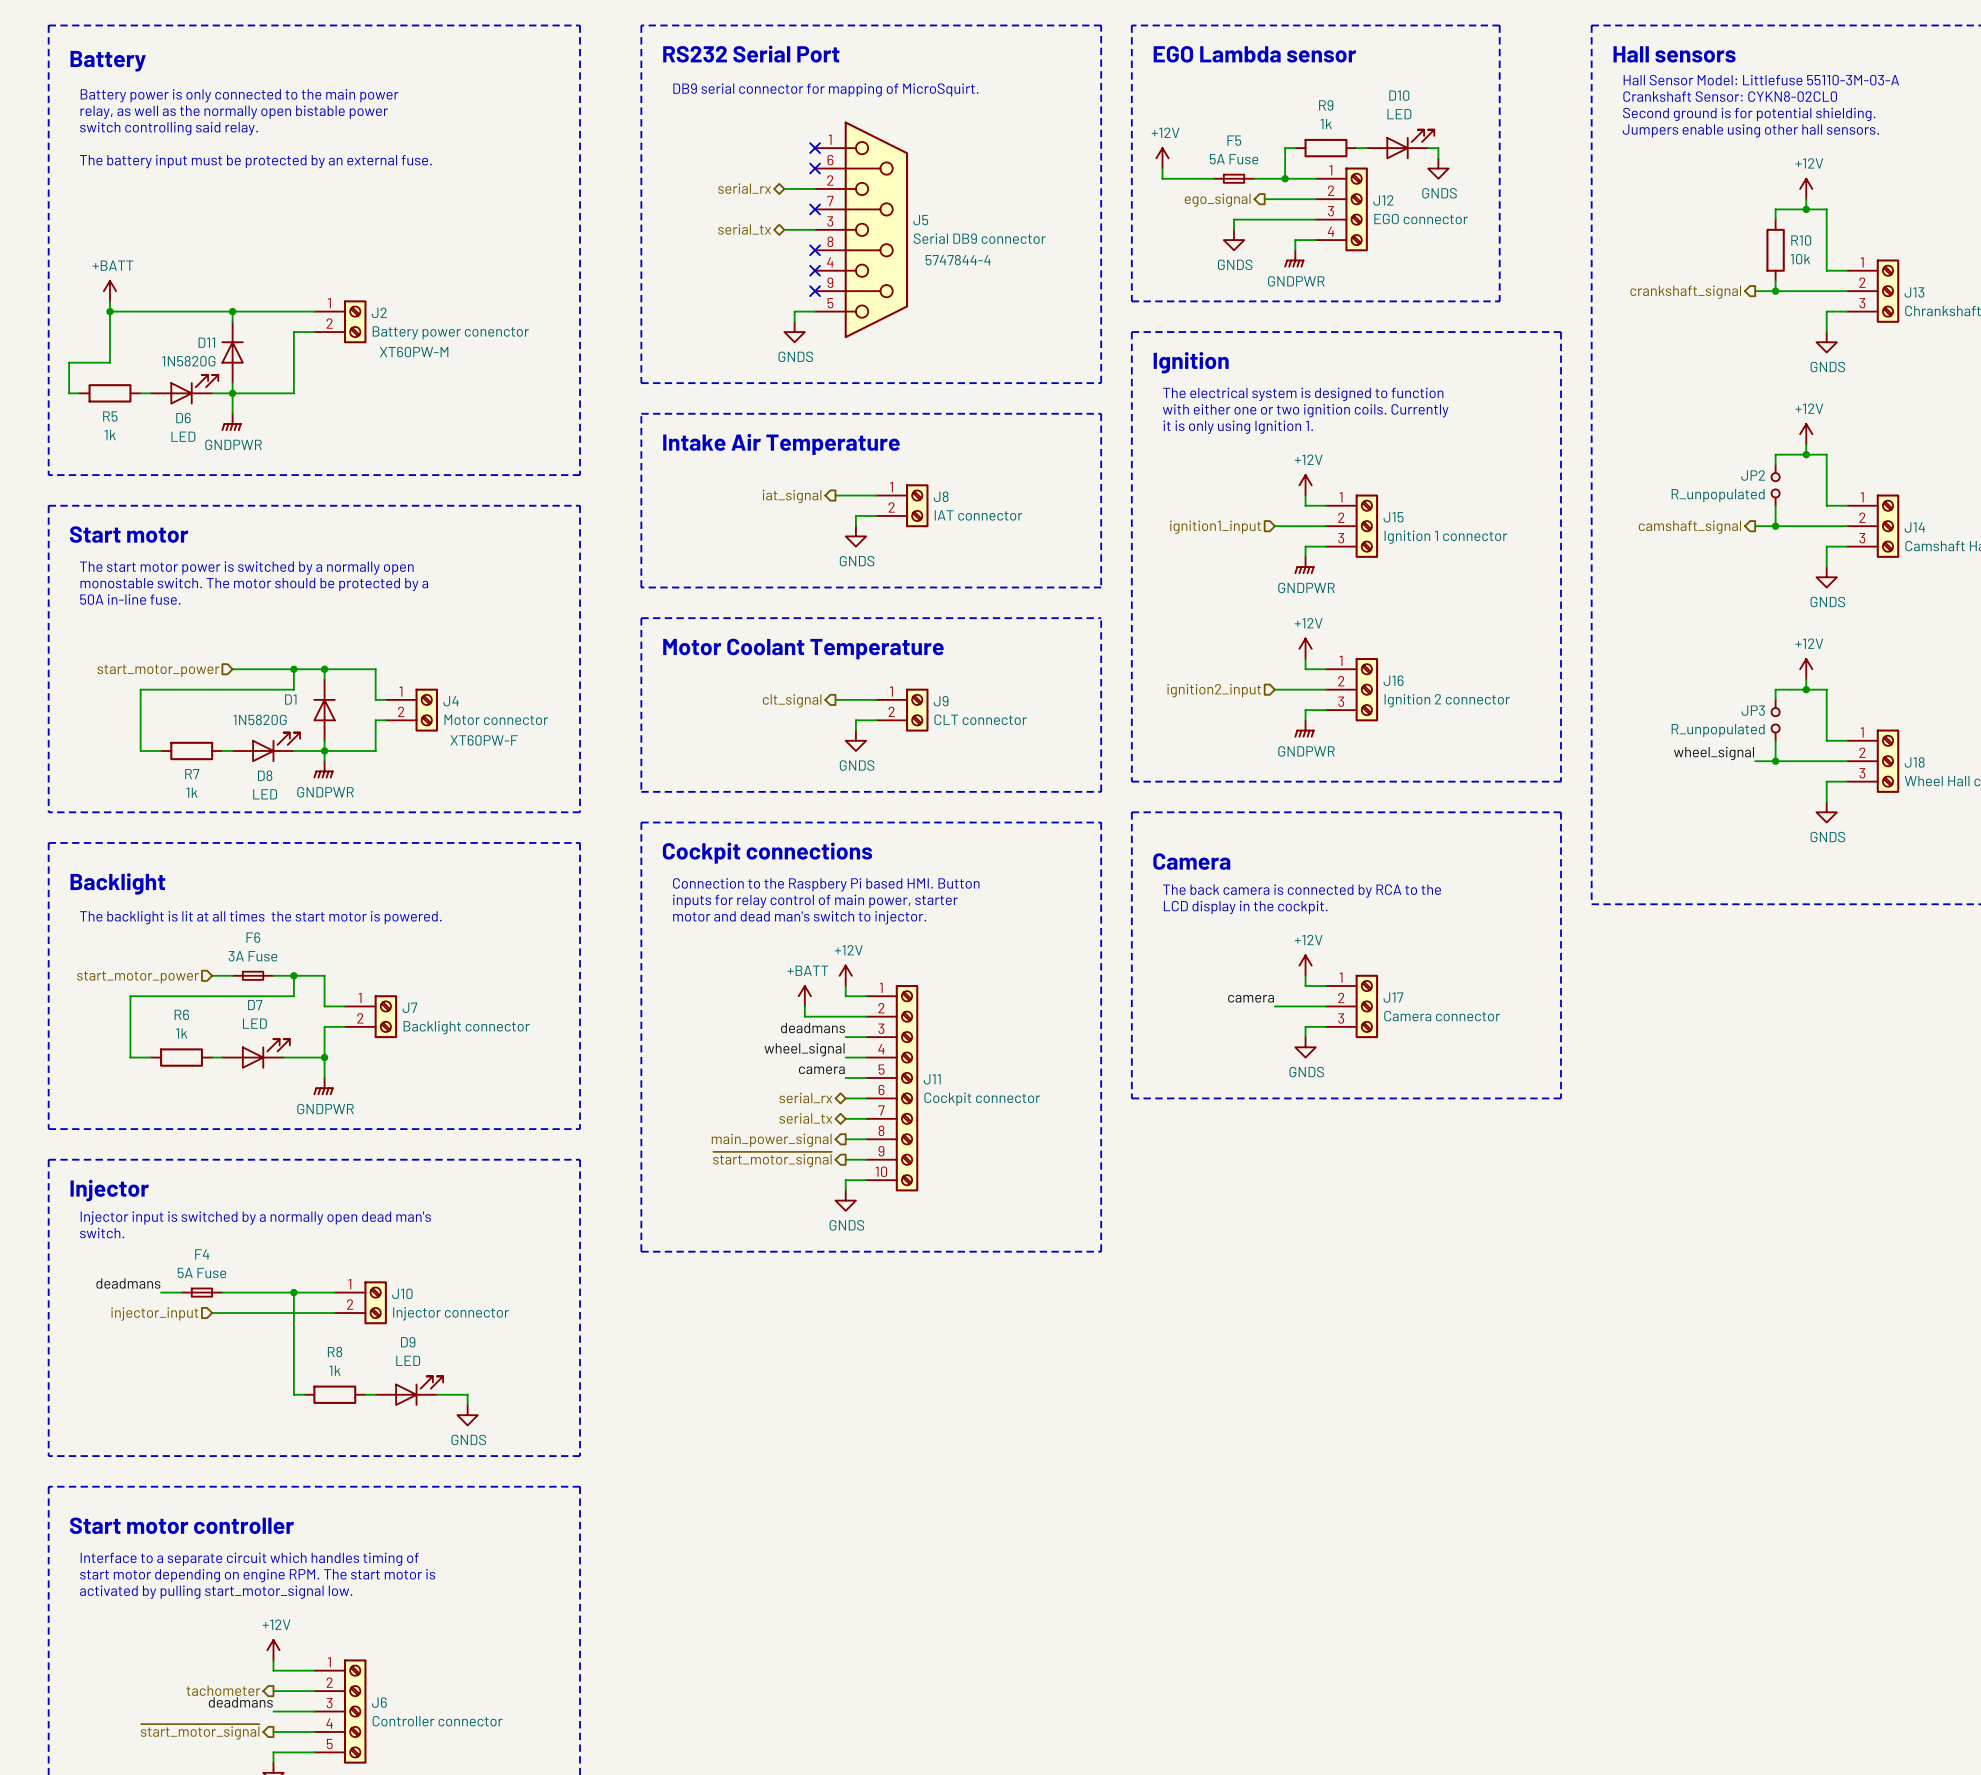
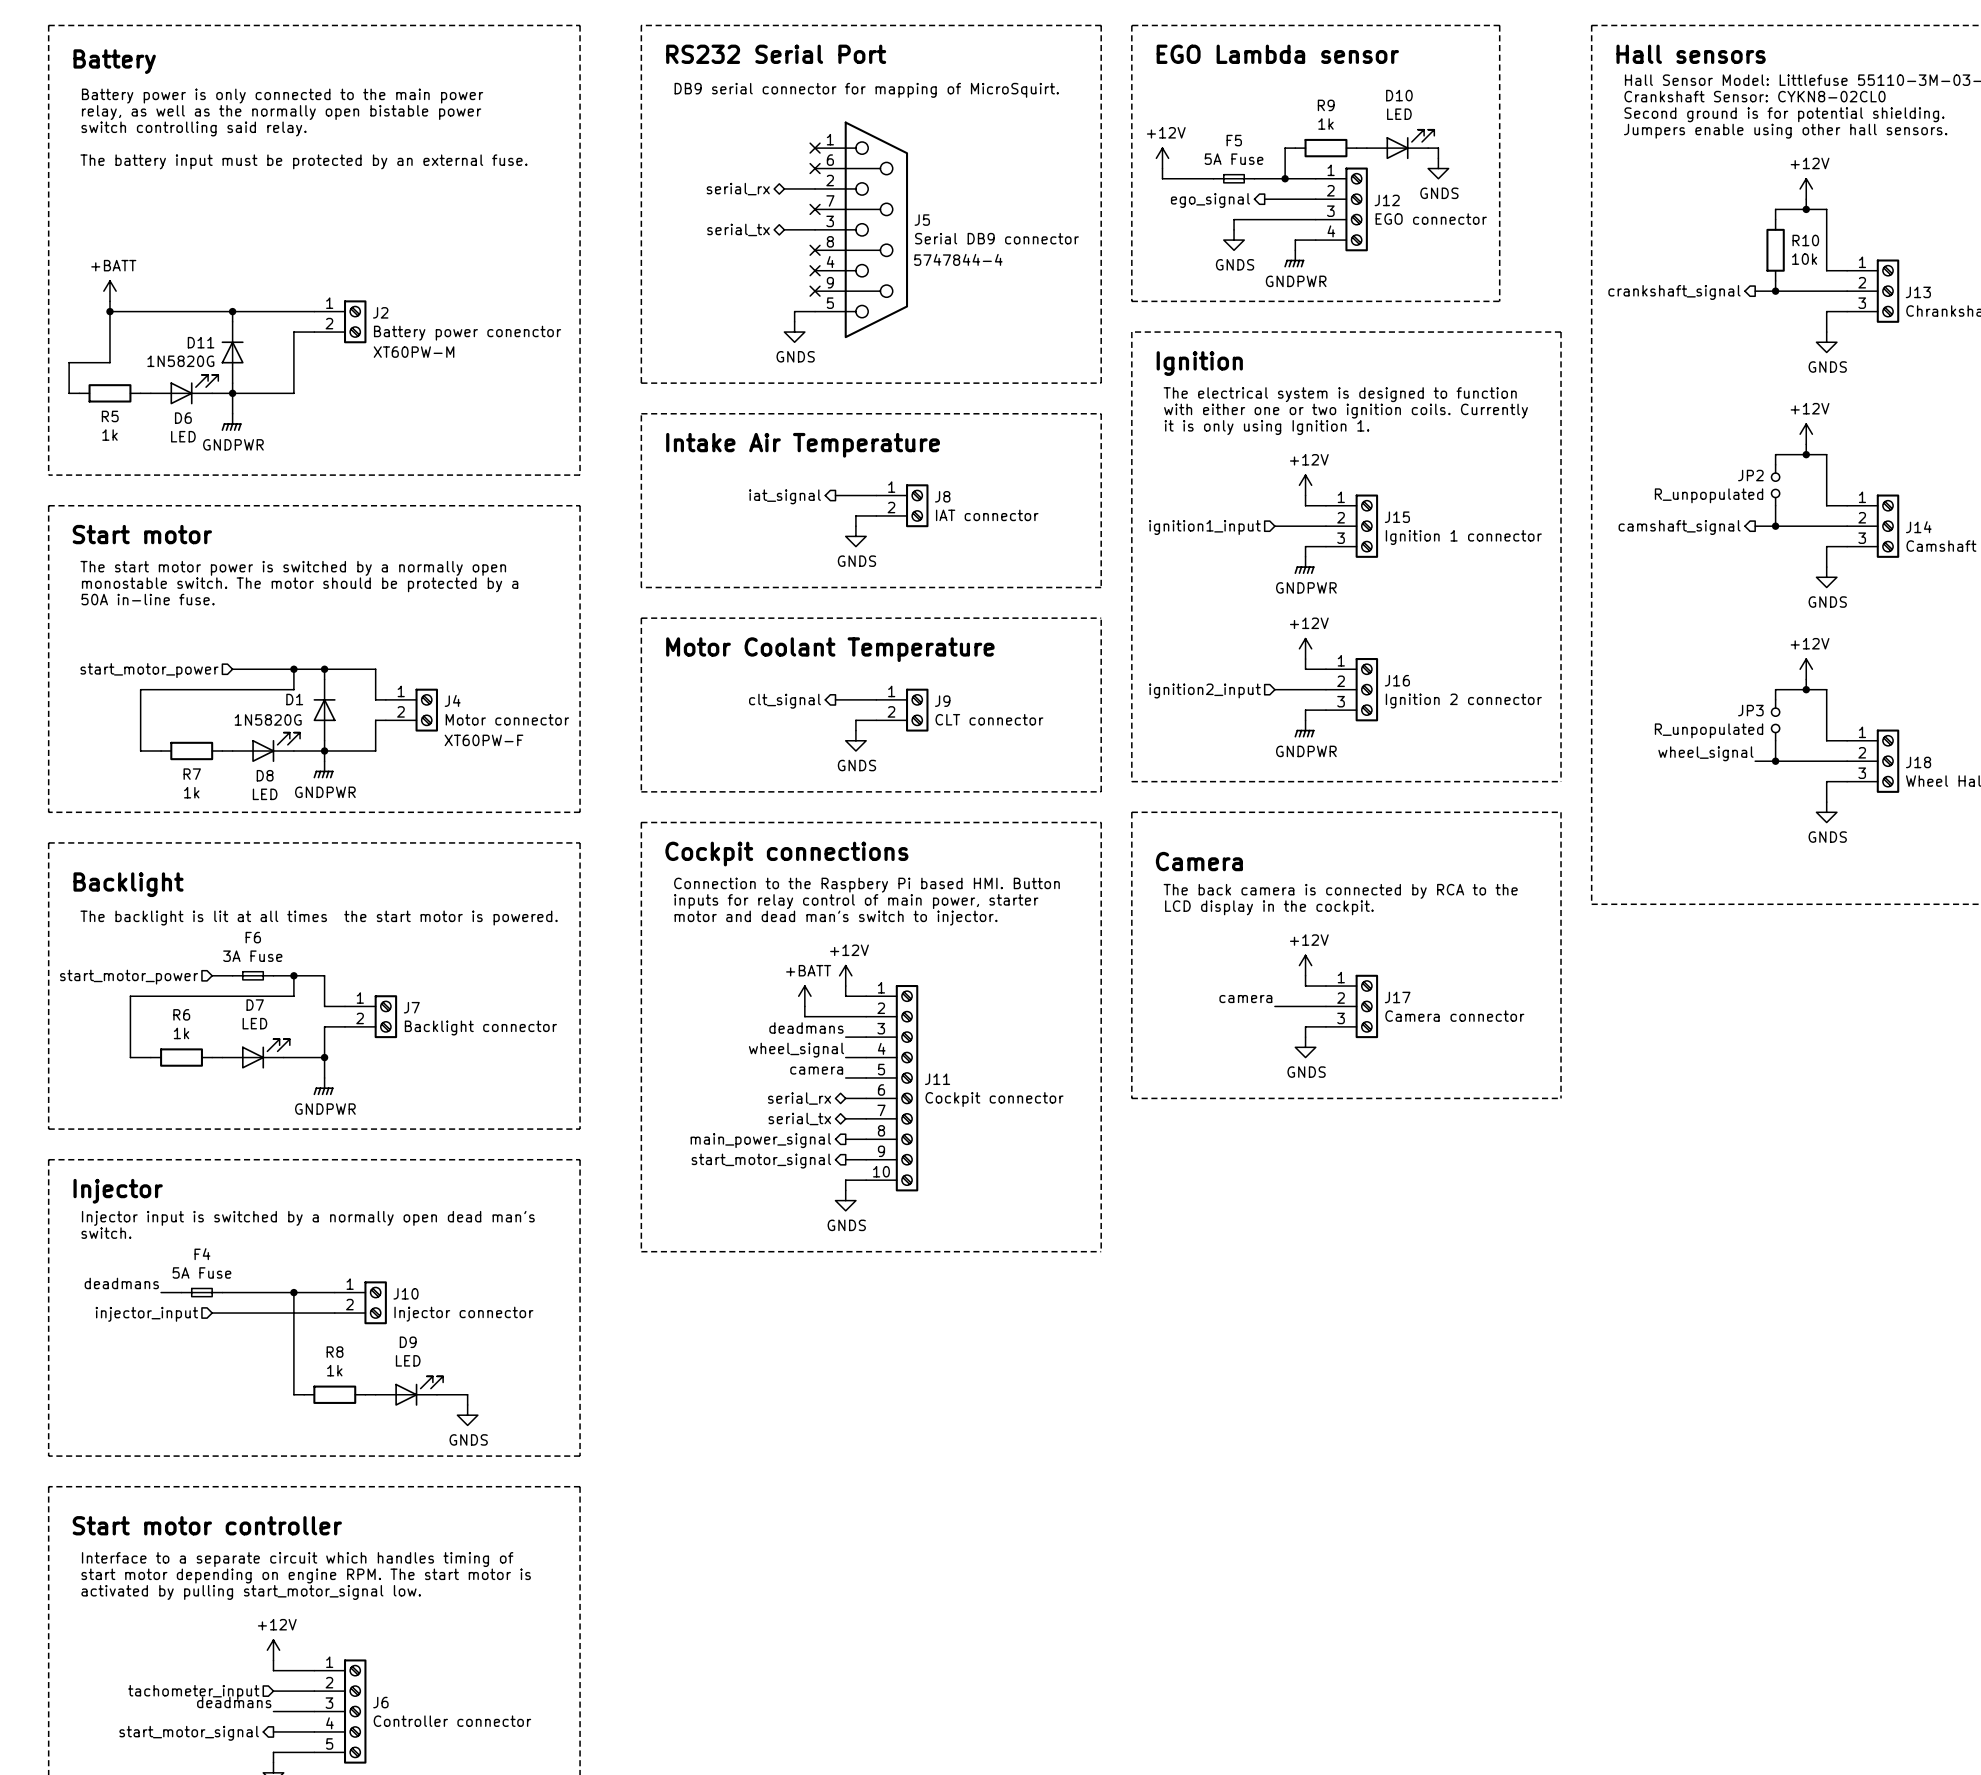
hierarchical label: ~{start_motor_signal} (772, 1159) -> start_motor_signal (761, 1161)
hierarchical label shape: output (223, 1690) -> input (193, 1692)
hierarchical label: tachometer (223, 1690) -> tachometer_input (193, 1692)
hierarchical label: ~{start_motor_signal} (200, 1731) -> start_motor_signal (189, 1733)

